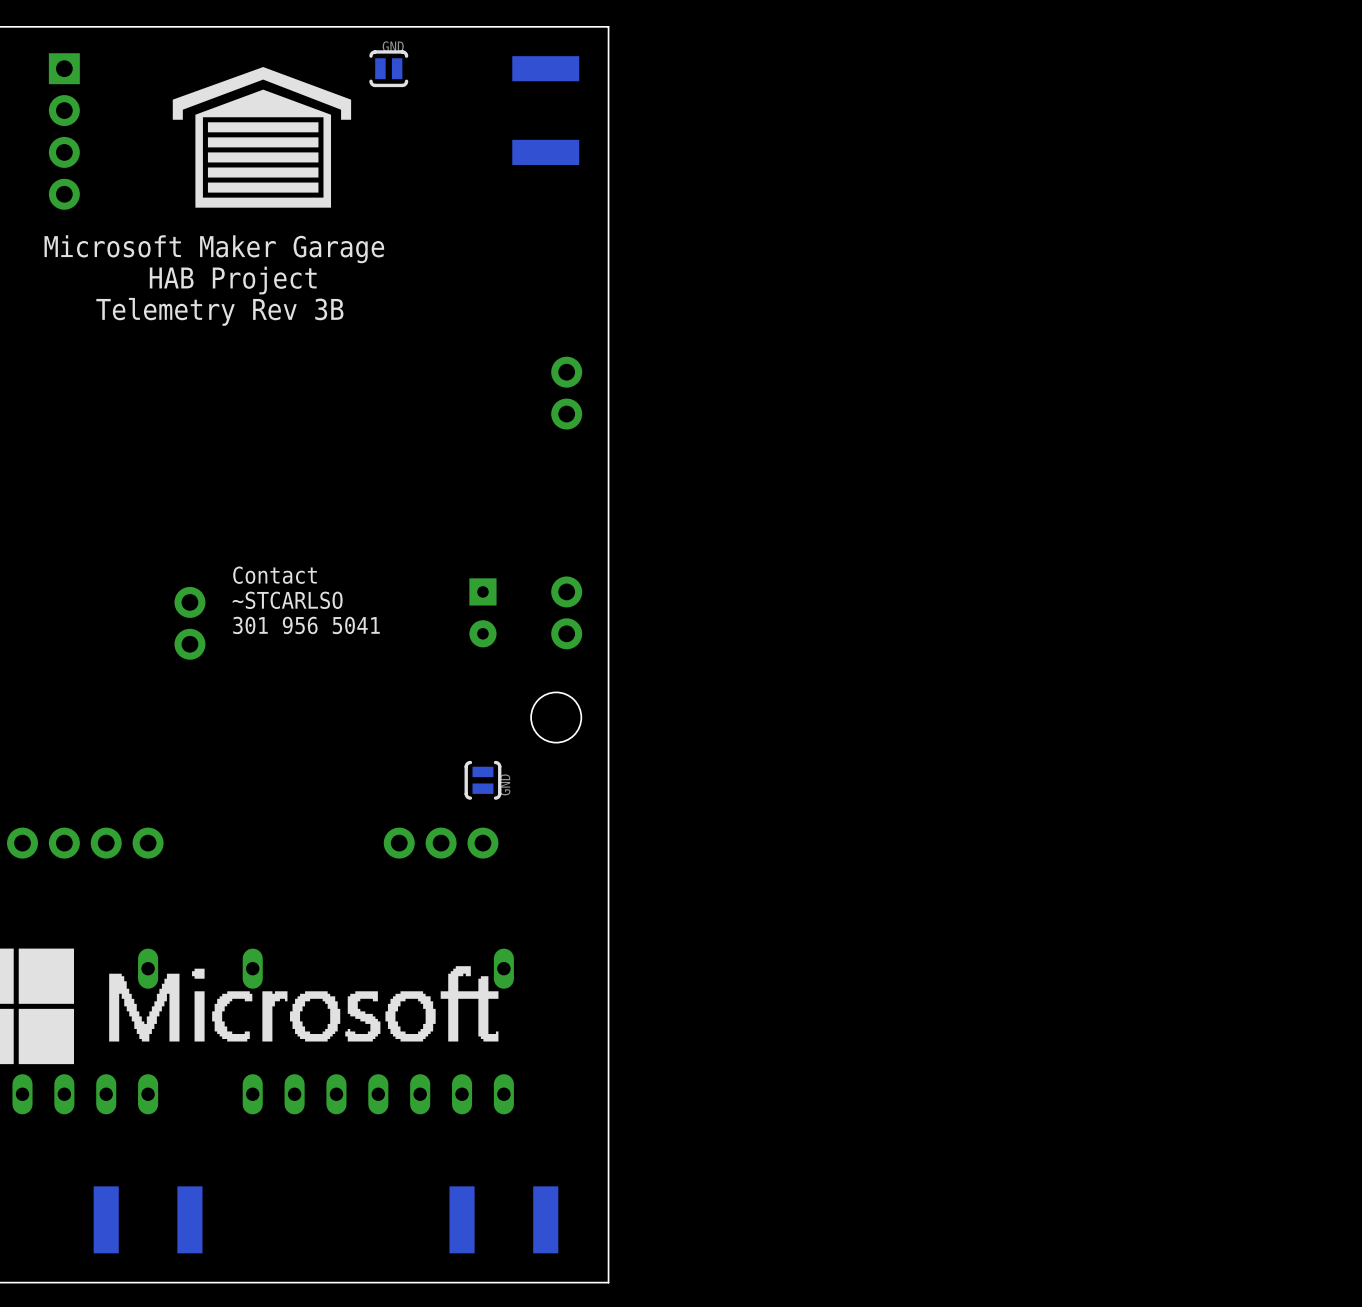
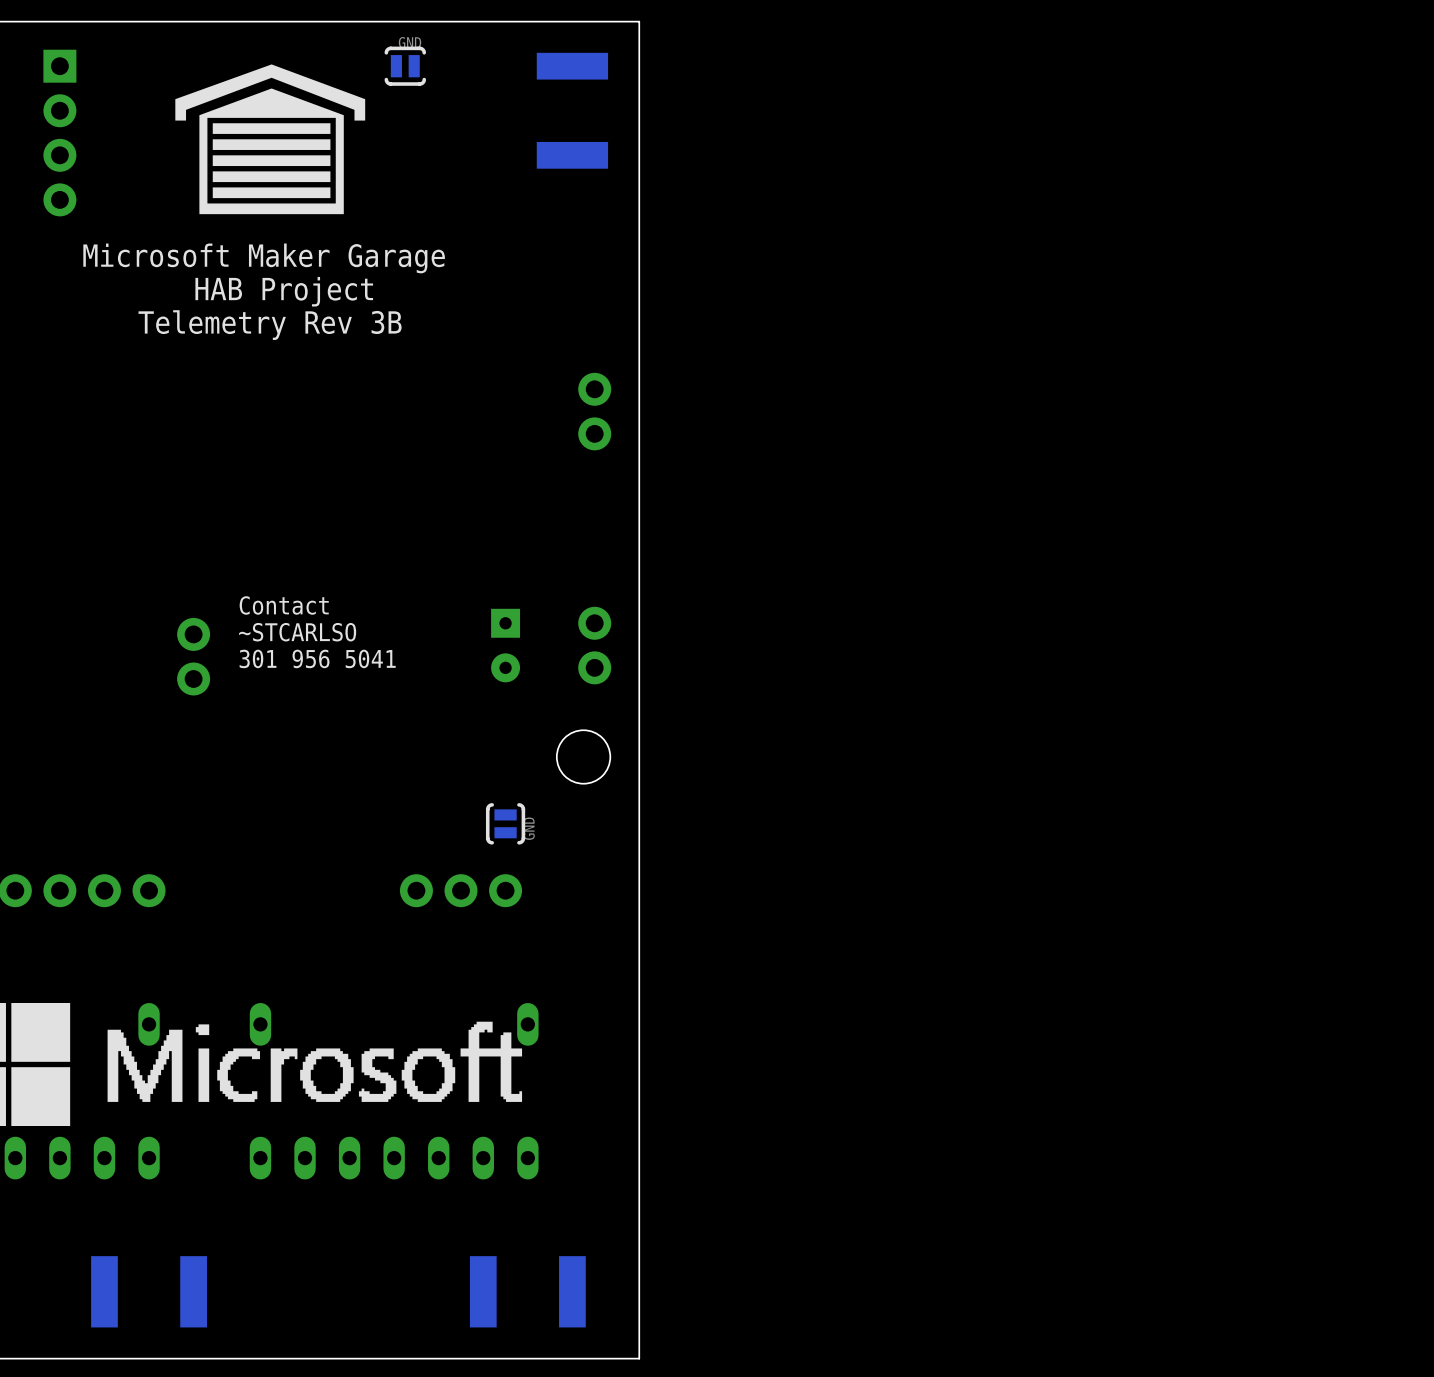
text position: Microsoft Maker Garage (214, 249) -> Microsoft Maker Garage (264, 258)
text position: HAB Project (233, 280) -> HAB Project (284, 291)
text position: Telemetry Rev 3B (219, 311) -> Telemetry Rev 3B (270, 325)

